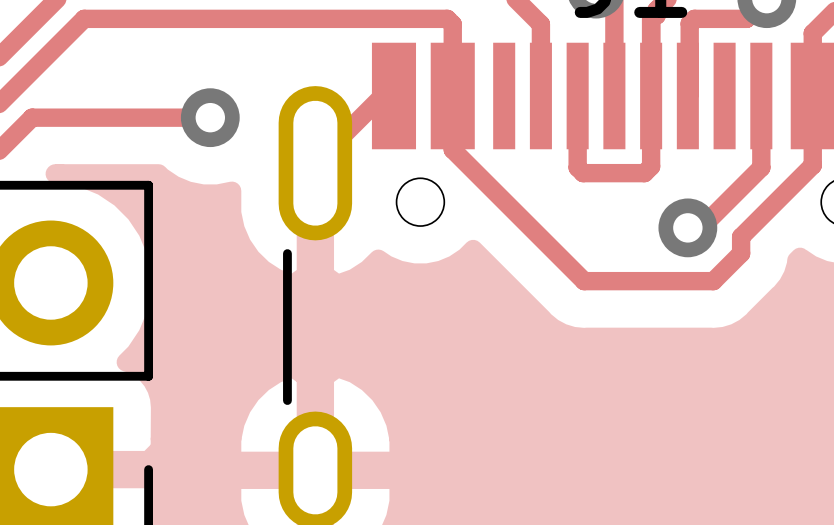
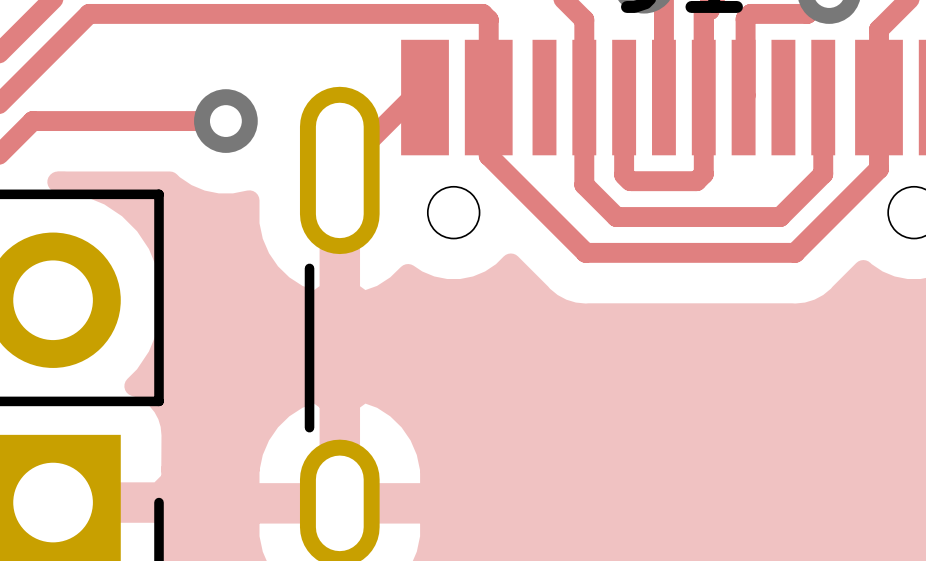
track: (812, 161) (812, 165) (741, 236) (741, 253) (713, 281) (584, 281) (542, 239) -> (878, 168) (795, 252) (585, 252)
track: (761, 167) (701, 227) (687, 227) -> (823, 174) (780, 217) (616, 217) (584, 184) (584, 97)
via: (687, 227) -> none

